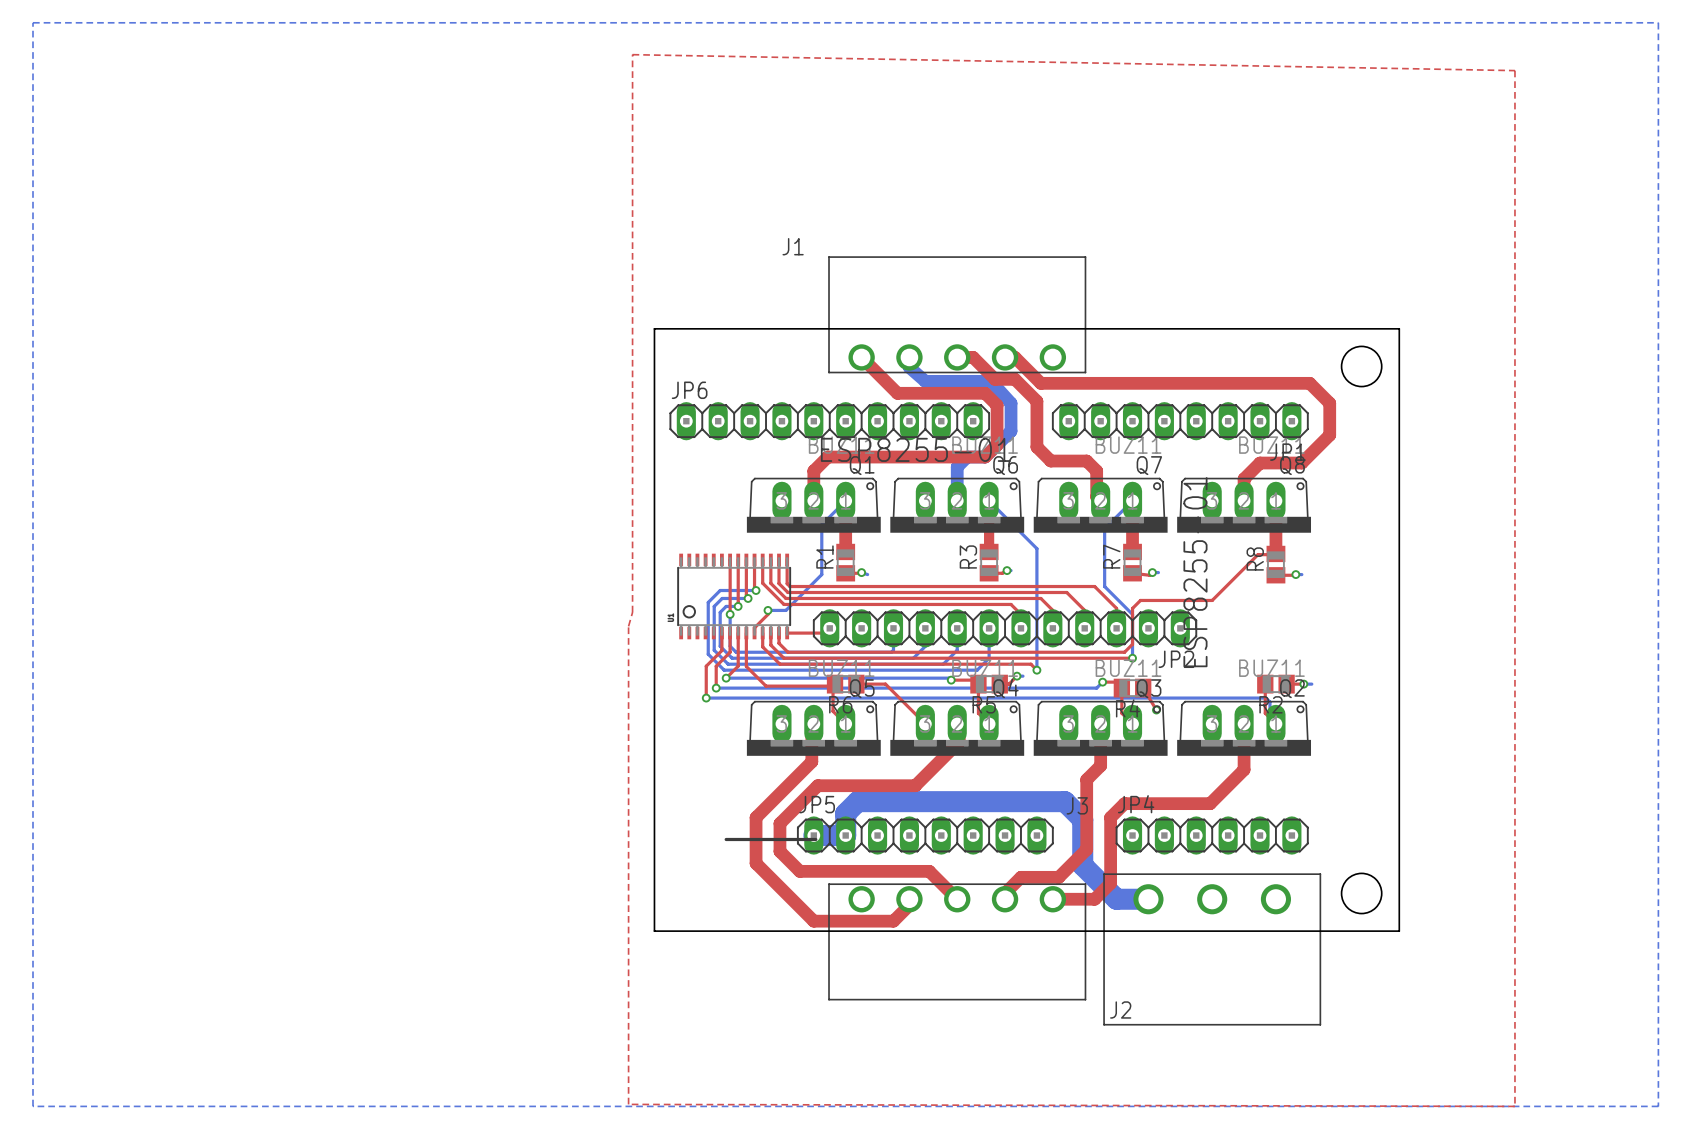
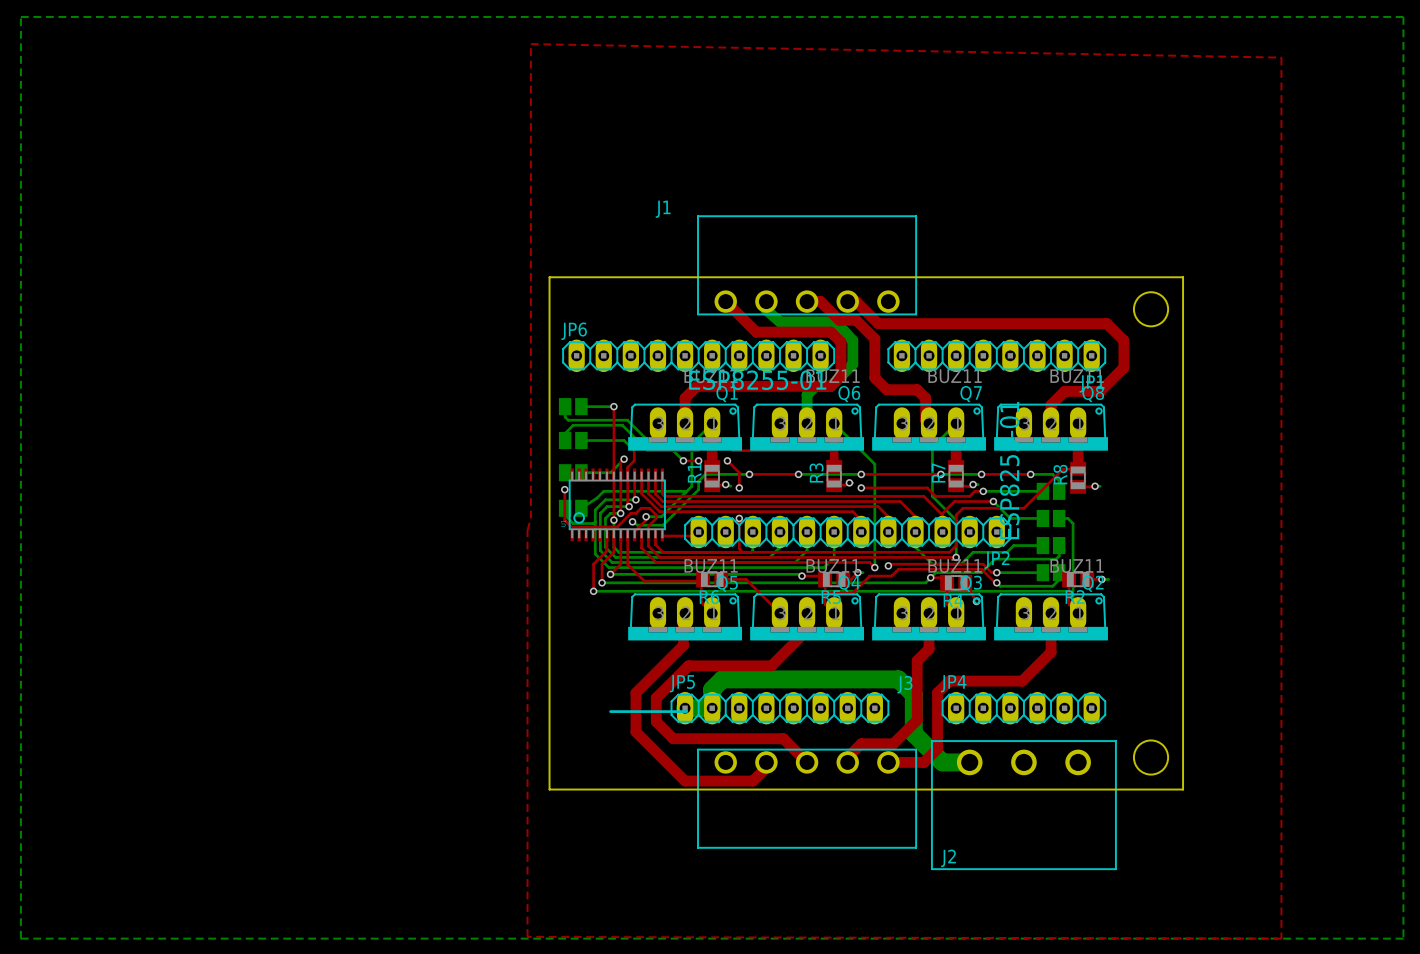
bottom track: none -> (565, 406) (565, 417) (568, 420) (627, 420) (652, 445) (668, 445) (683, 460)
part: none -> (573, 406)
bottom track: none -> (581, 406) (613, 406)
top track: none -> (613, 406) (613, 473)
via: none -> (613, 406)
bottom track: none -> (565, 440) (565, 433) (573, 425) (622, 425) (647, 450)
part: none -> (573, 440)
bottom track: none -> (581, 440) (624, 440) (634, 450)
top track: none -> (634, 450) (634, 460) (627, 467) (627, 473)
top track: none -> (647, 450) (698, 450)
top track: none -> (732, 450) (834, 450)
top track: none -> (624, 459) (620, 462) (620, 473)
bottom track: none -> (624, 459) (610, 472) (581, 472)
via: none -> (624, 459)
top track: none -> (683, 460) (698, 460)
via: none -> (683, 460)
via: none -> (698, 460)
top track: none -> (727, 460) (739, 472) (739, 487)
via: none -> (727, 460)
part: none -> (573, 472)
top track: none -> (749, 474) (798, 474)
bottom track: none -> (749, 474) (705, 474) (698, 481) (698, 489) (663, 525) (637, 525) (632, 521)
via: none -> (749, 474)
bottom track: none -> (798, 474) (861, 474)
via: none -> (798, 474)
top track: none -> (861, 474) (940, 474)
via: none -> (861, 474)
bottom track: none -> (940, 474) (981, 474)
via: none -> (940, 474)
top track: none -> (981, 474) (1030, 474)
via: none -> (981, 474)
bottom track: none -> (1030, 474) (1052, 474) (1059, 480) (1059, 491)
via: none -> (1030, 474)
via: none -> (739, 487)
top track: none -> (861, 487) (927, 487) (935, 496) (969, 496) (974, 491) (983, 491)
via: none -> (861, 487)
top track: none -> (564, 489) (564, 520) (571, 526) (617, 526) (630, 513) (635, 513) (641, 508) (649, 508) (656, 515) (656, 518) (648, 526) (648, 536)
via: none -> (564, 489)
bottom track: none -> (983, 491) (1042, 491)
via: none -> (983, 491)
part: none -> (1051, 491)
bottom track: none -> (685, 492) (603, 491) (581, 508)
top track: none -> (993, 501) (954, 501) (941, 514)
bottom track: none -> (993, 501) (1010, 518) (1042, 518)
via: none -> (993, 501)
bottom track: none -> (565, 508) (565, 515) (573, 523) (593, 523) (595, 521)
part: none -> (573, 508)
top track: none -> (739, 518) (739, 548) (742, 552)
via: none -> (739, 518)
part: none -> (1051, 518)
bottom track: none -> (1059, 518) (1067, 518) (1073, 523) (1073, 591) (1071, 593)
via: none -> (632, 521)
bottom track: none -> (915, 532) (915, 547) (932, 564) (961, 564) (973, 552) (1006, 552) (1013, 545) (1042, 545)
part: none -> (1051, 545)
bottom track: none -> (1059, 545) (1059, 556) (1056, 559) (995, 559) (981, 572) (935, 572) (930, 577)
top track: none -> (888, 565) (888, 564) (983, 564) (991, 572) (996, 572)
via: none -> (888, 565)
bottom track: none -> (996, 572) (1042, 572)
via: none -> (996, 572)
part: none -> (1051, 572)
bottom track: none -> (1059, 572) (1059, 579) (1052, 586) (1000, 586) (996, 582)
top track: none -> (996, 582) (981, 569) (898, 569) (891, 576) (869, 576) (852, 593) (825, 593)
via: none -> (996, 582)

